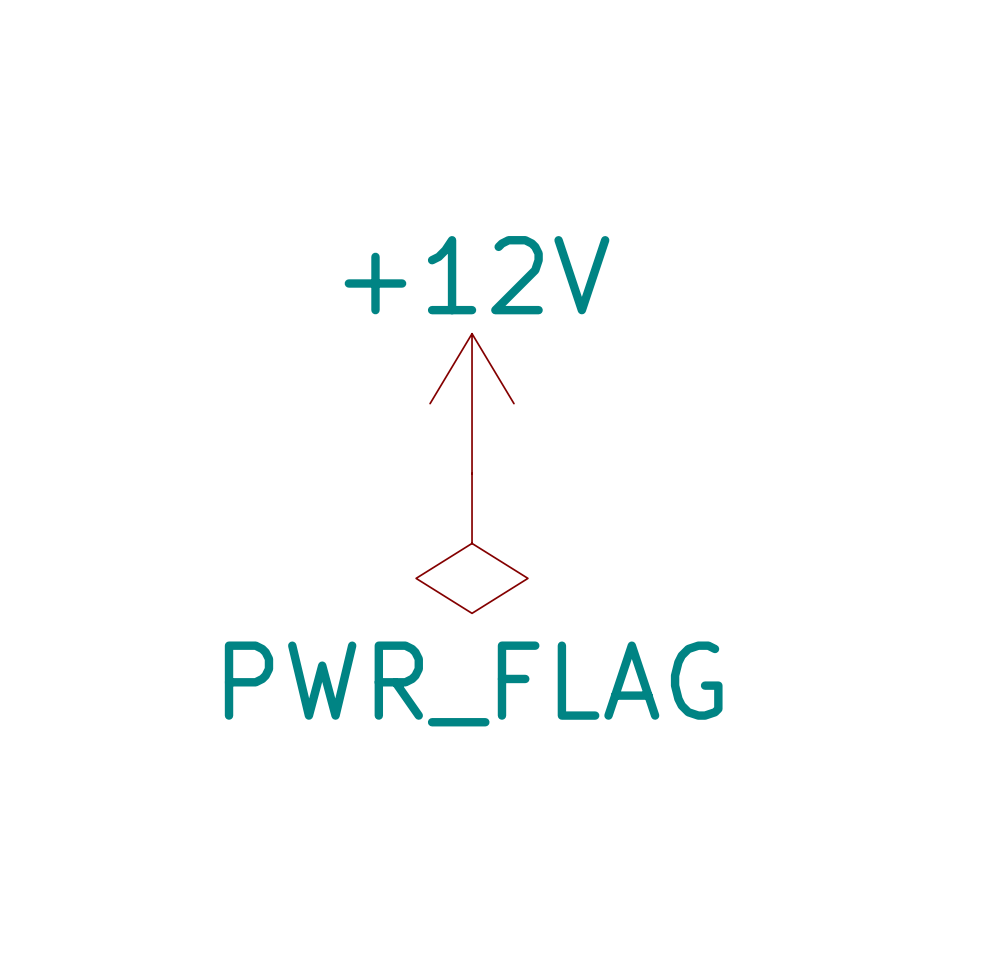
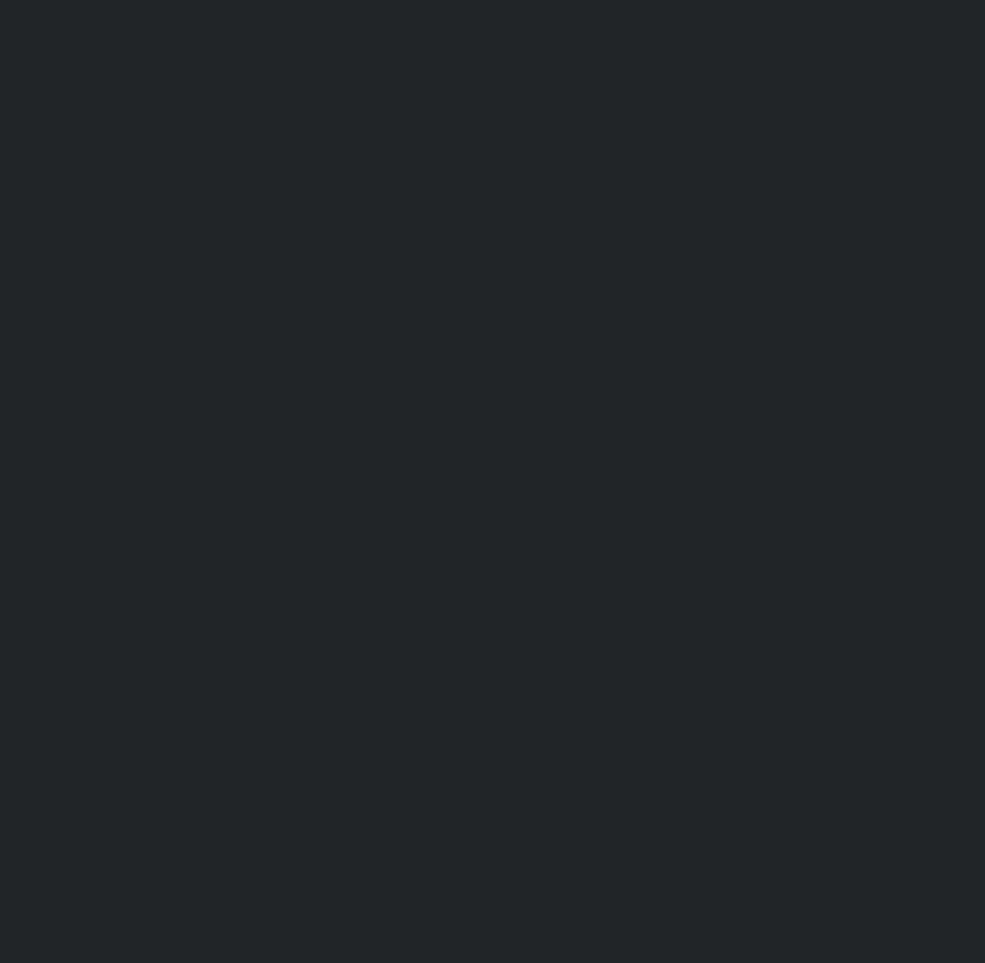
power symbol: +12V (472, 403) -> none
power symbol: PWR_FLAG (472, 543) -> none

